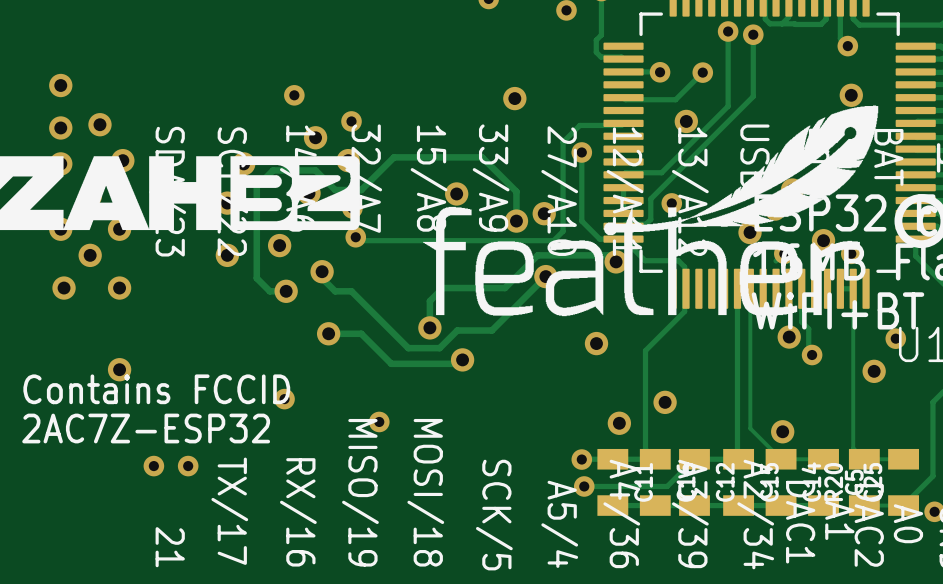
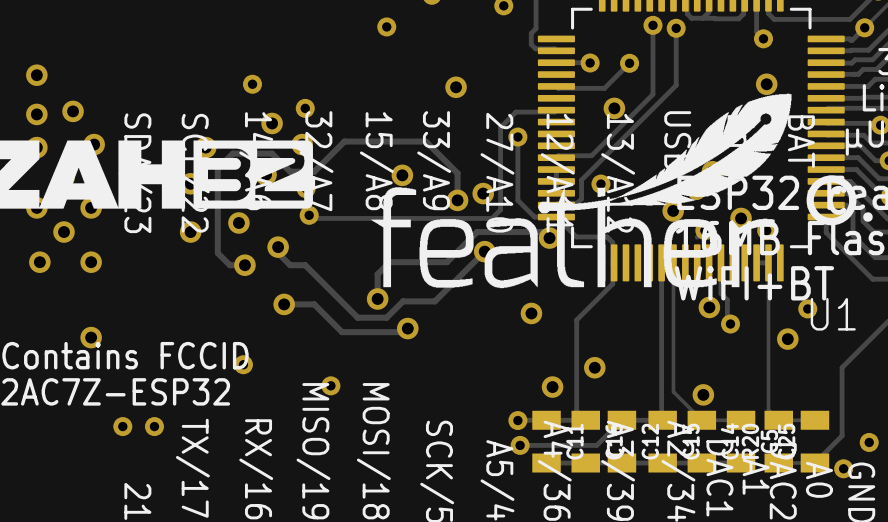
via: none -> (386, 26)

